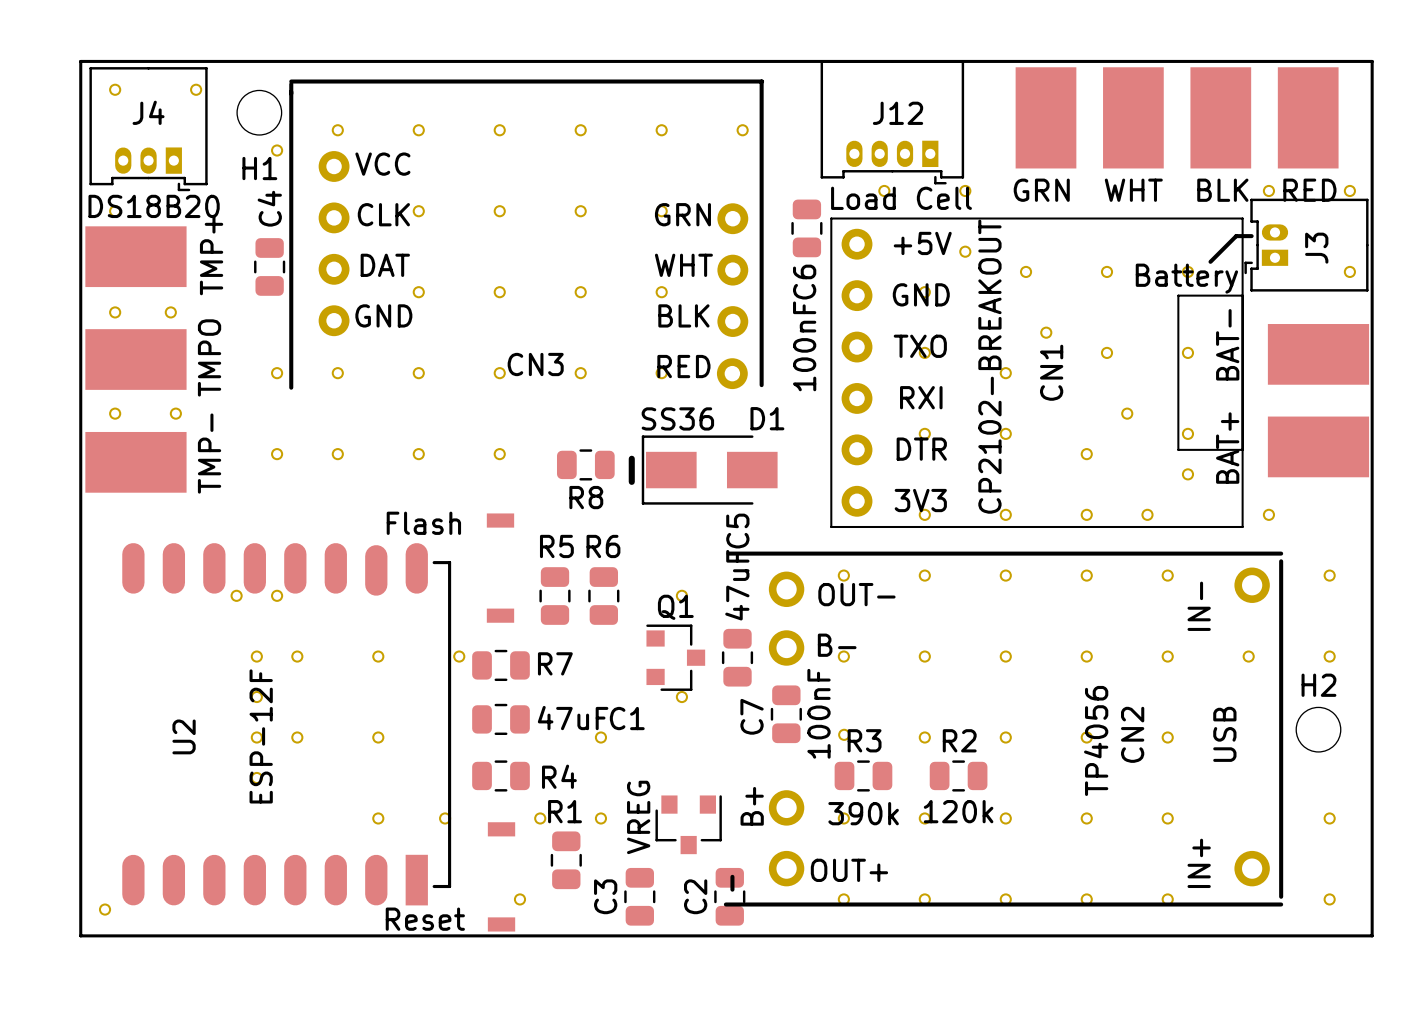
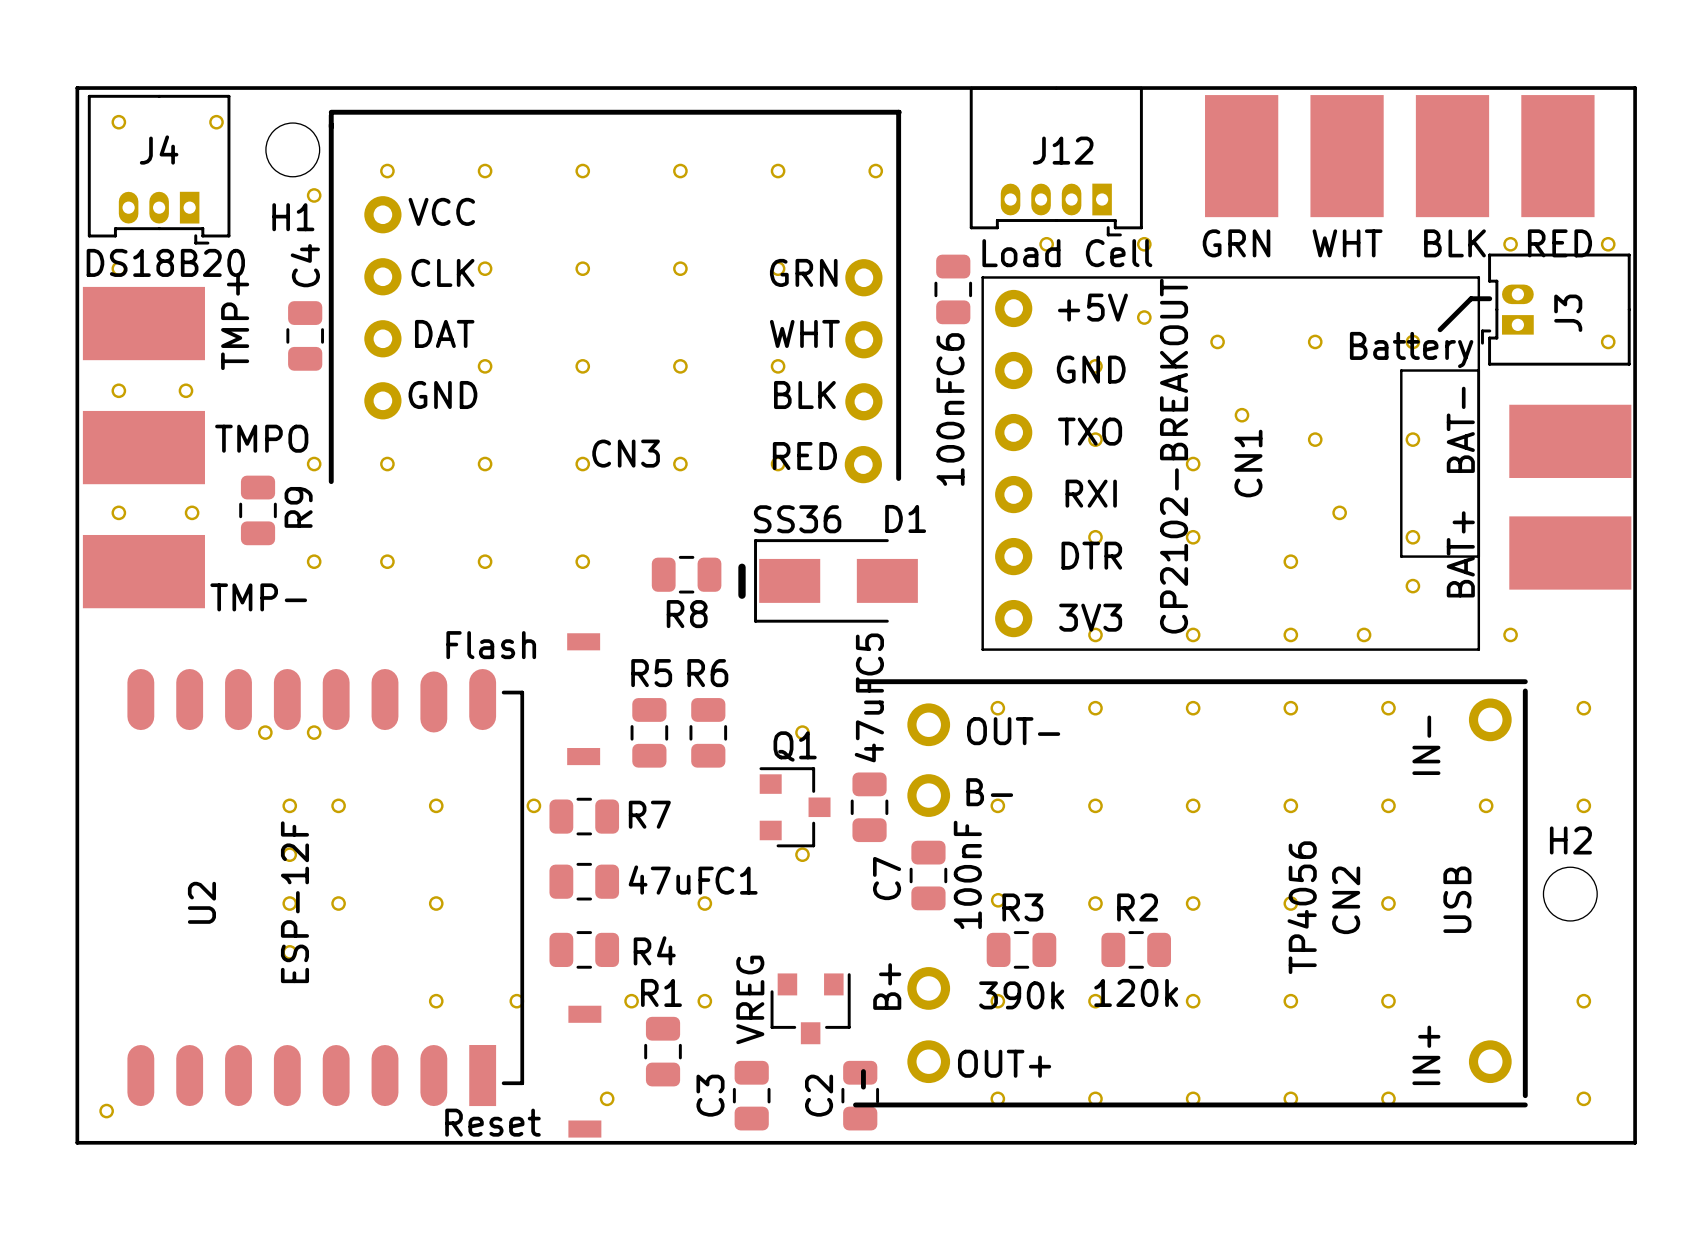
part value rotation: 0° (209, 357) -> 90° clockwise (261, 438)
R9: none -> (258, 510)
part value rotation: 0° (209, 453) -> 90° clockwise (258, 597)

